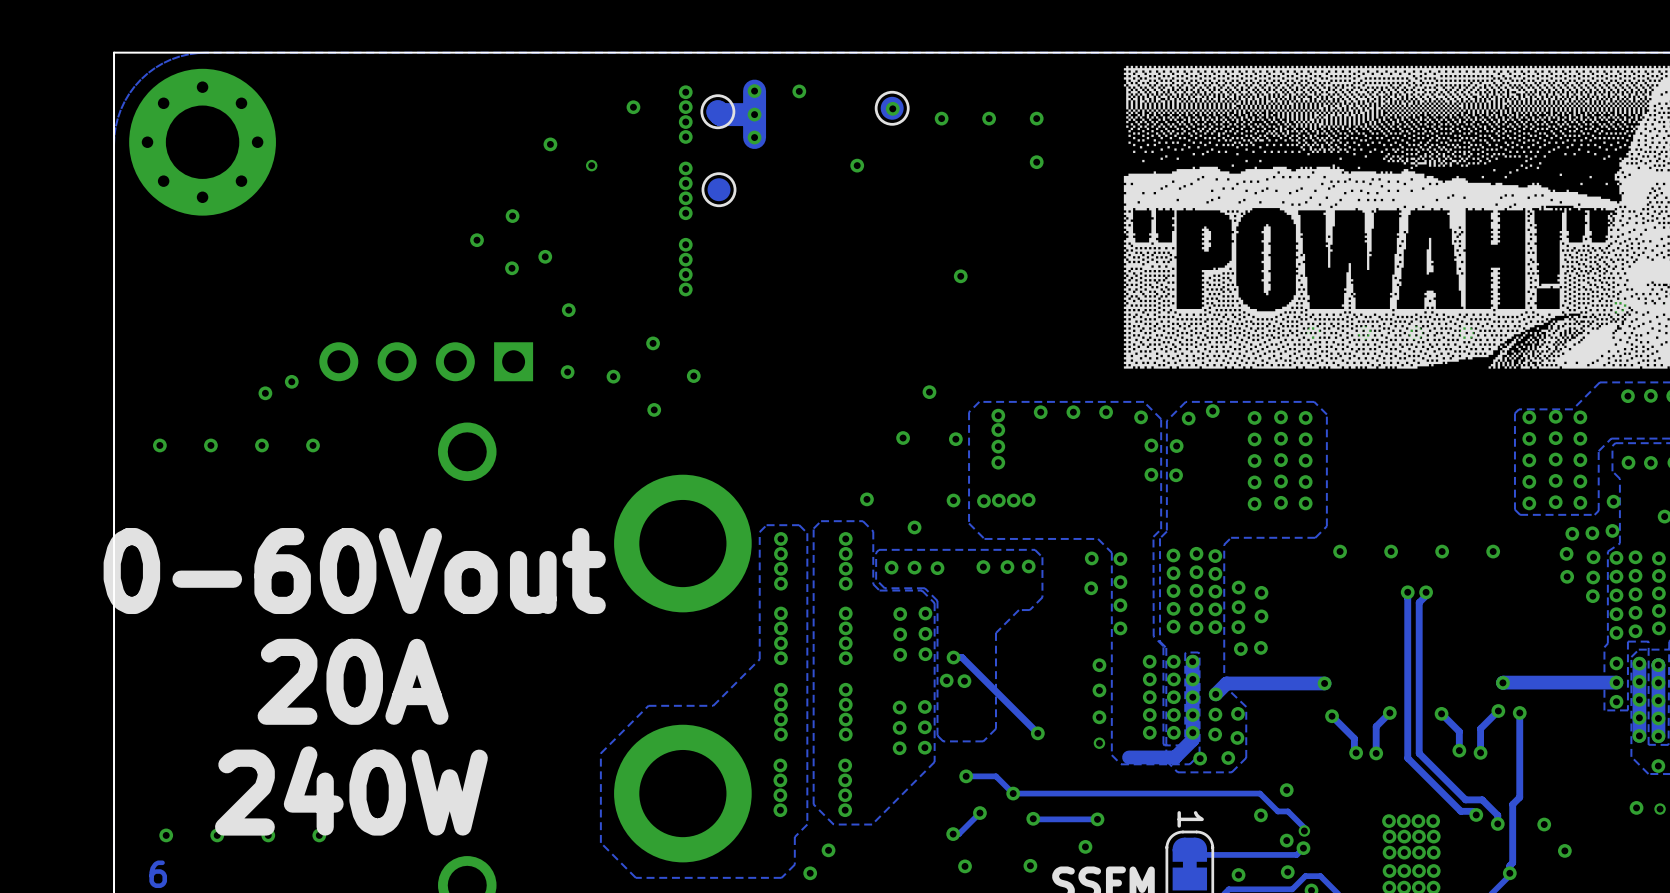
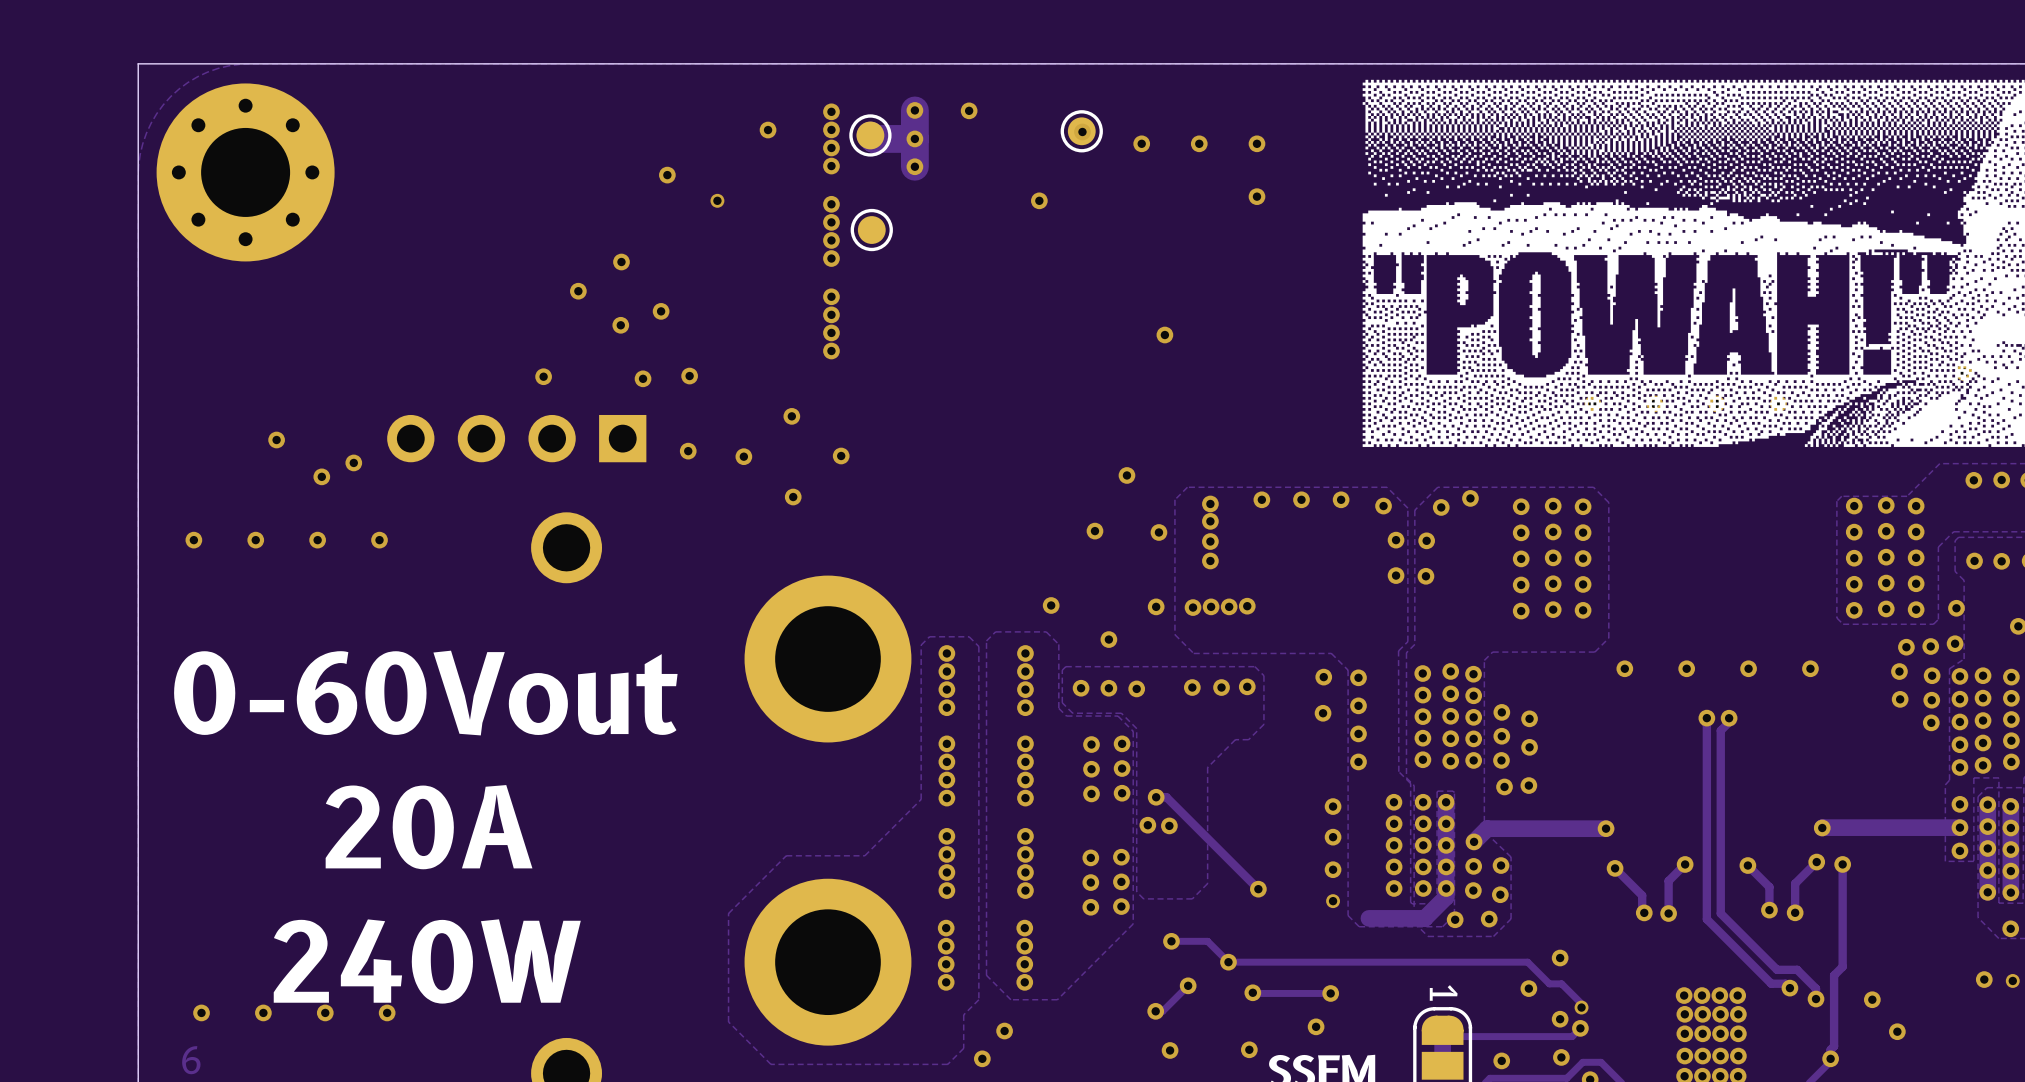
via: none -> (543, 376)
via: none -> (643, 378)
via: none -> (276, 440)

